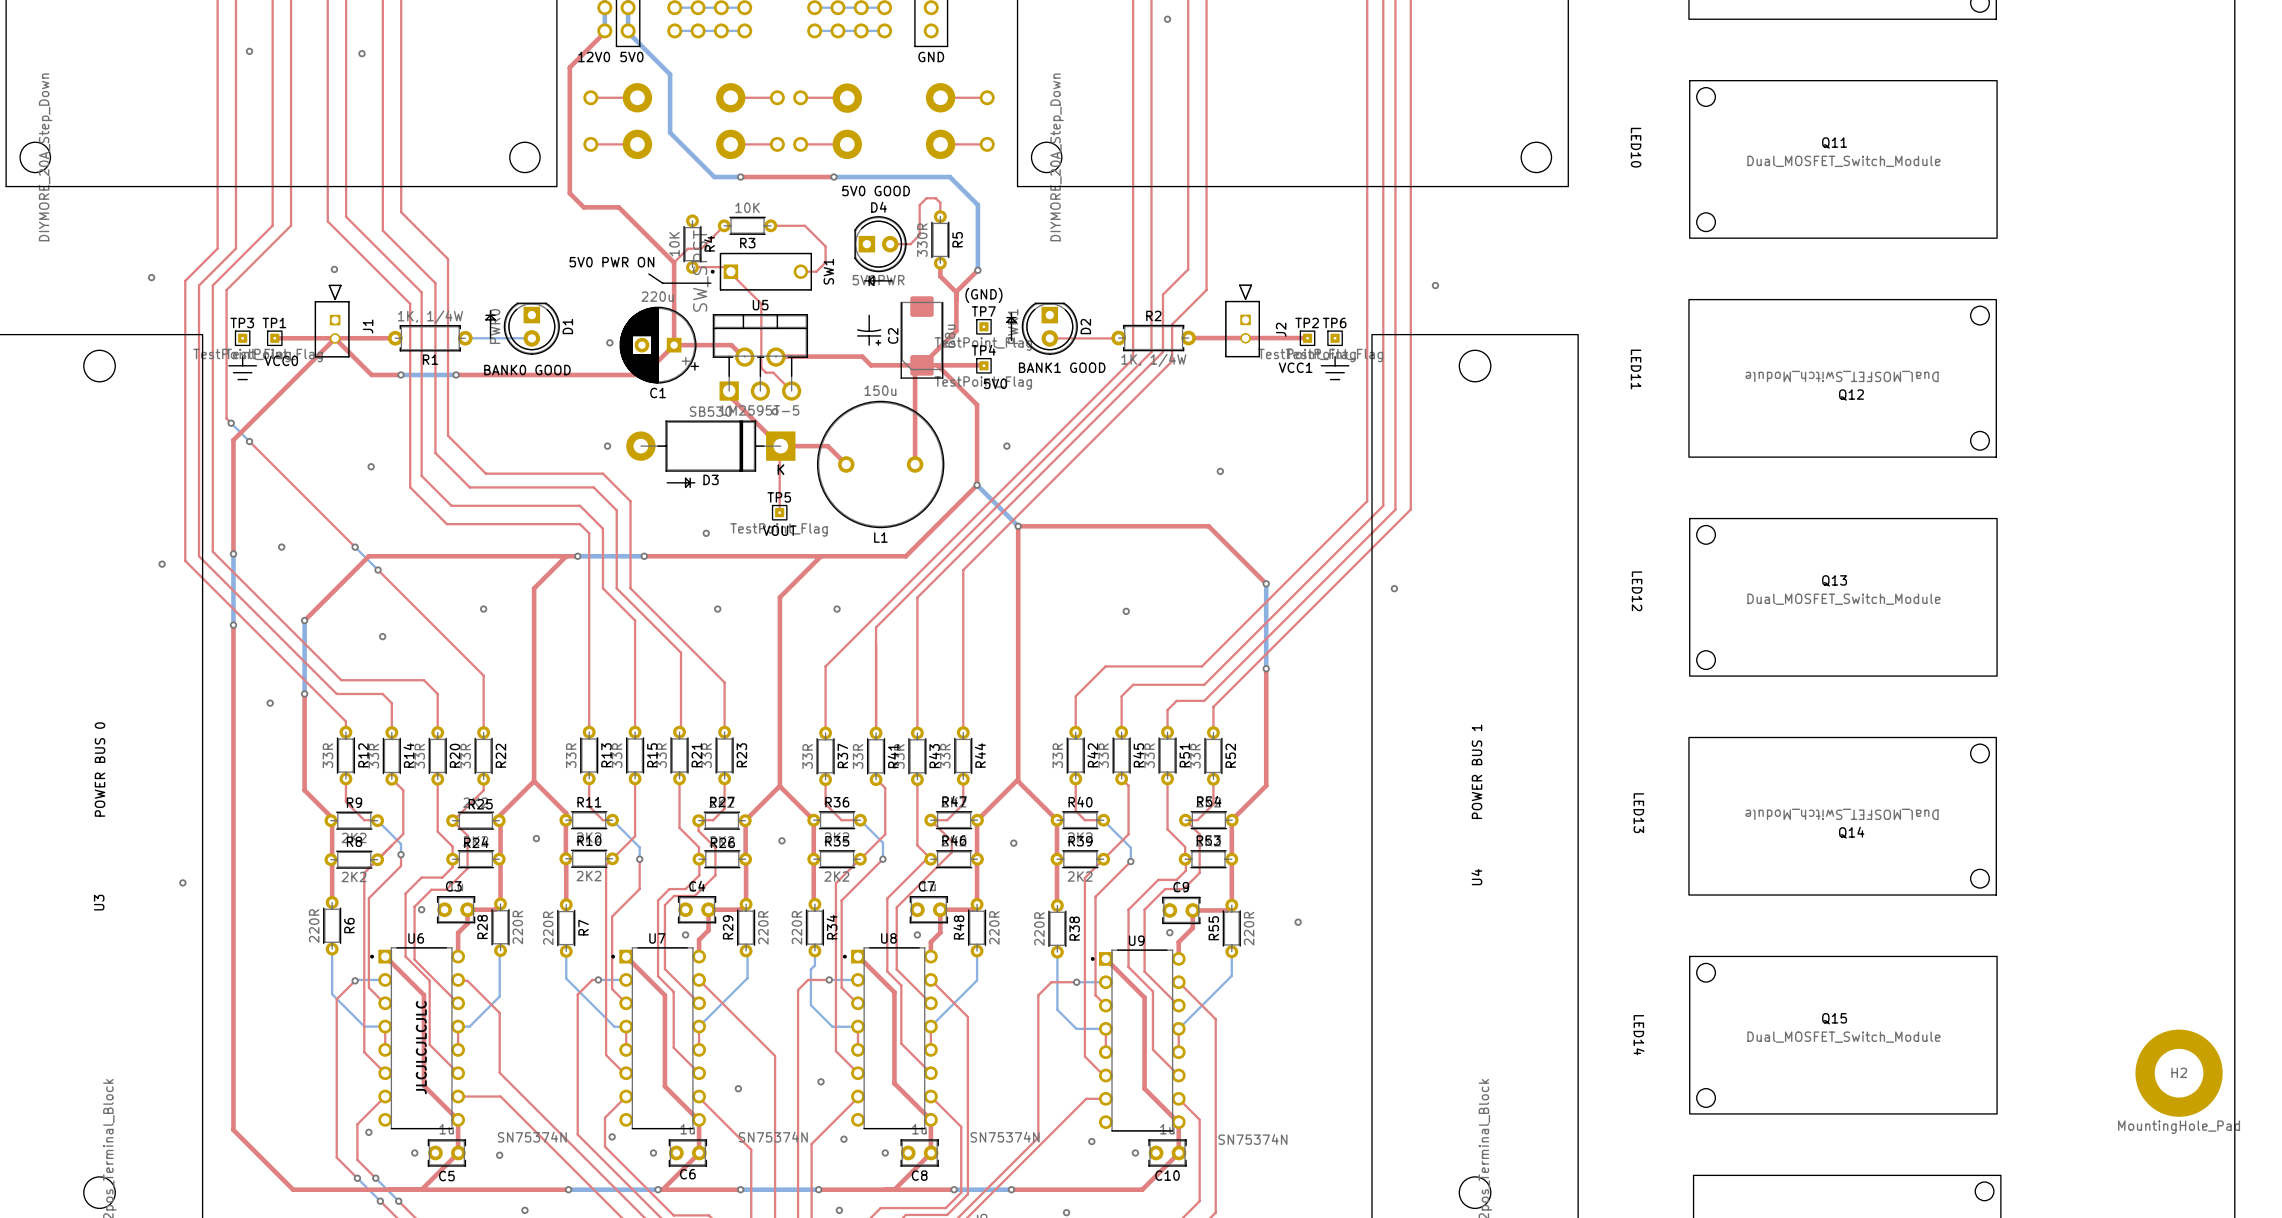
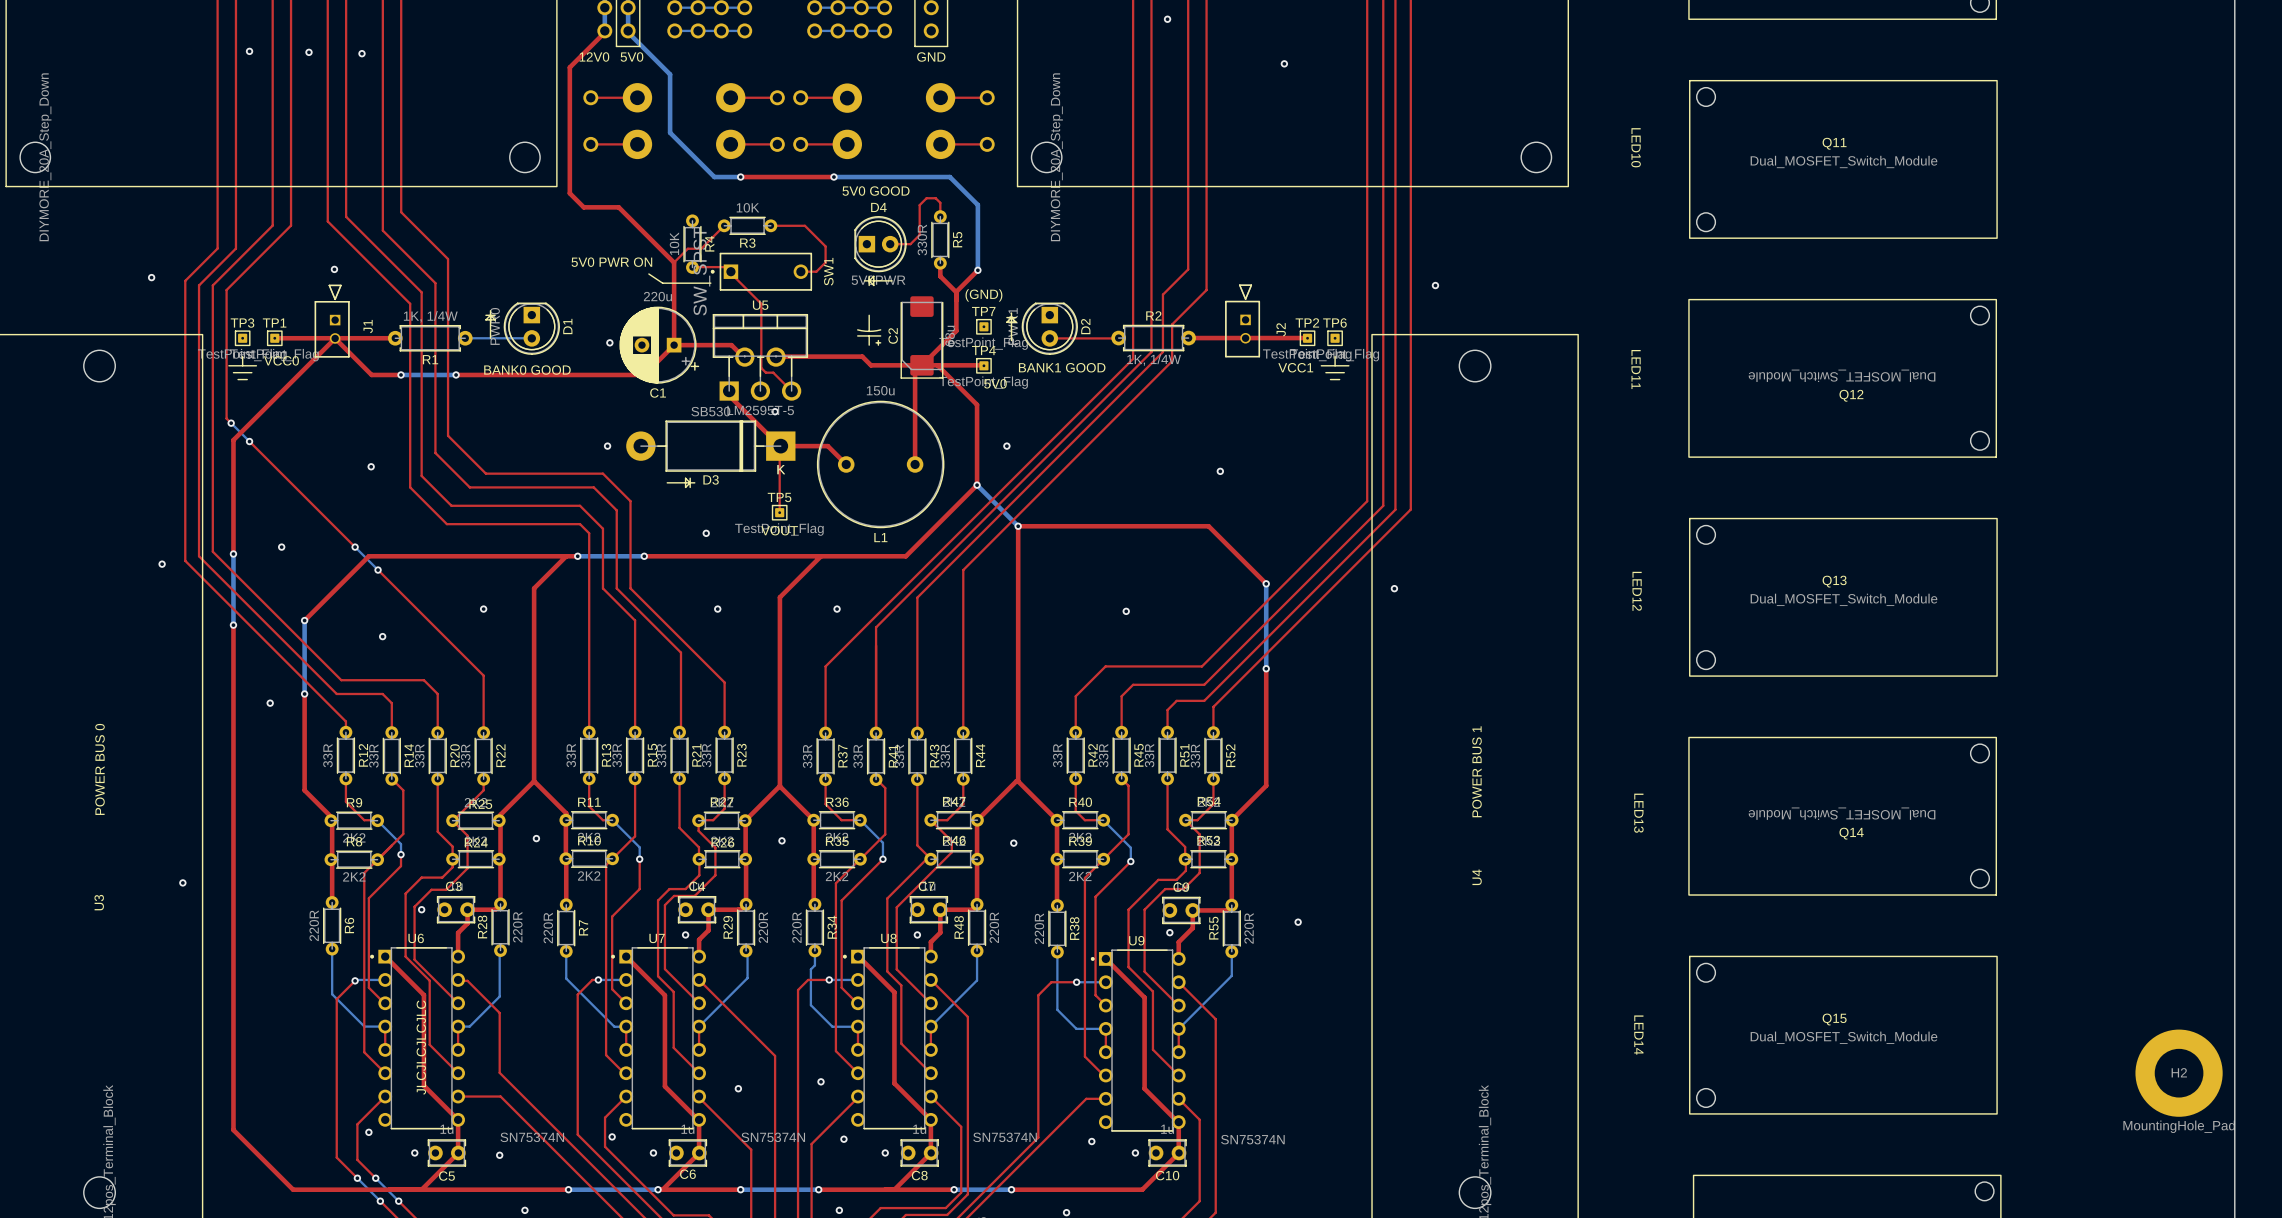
via: none -> (308, 52)
via: none -> (1284, 63)

